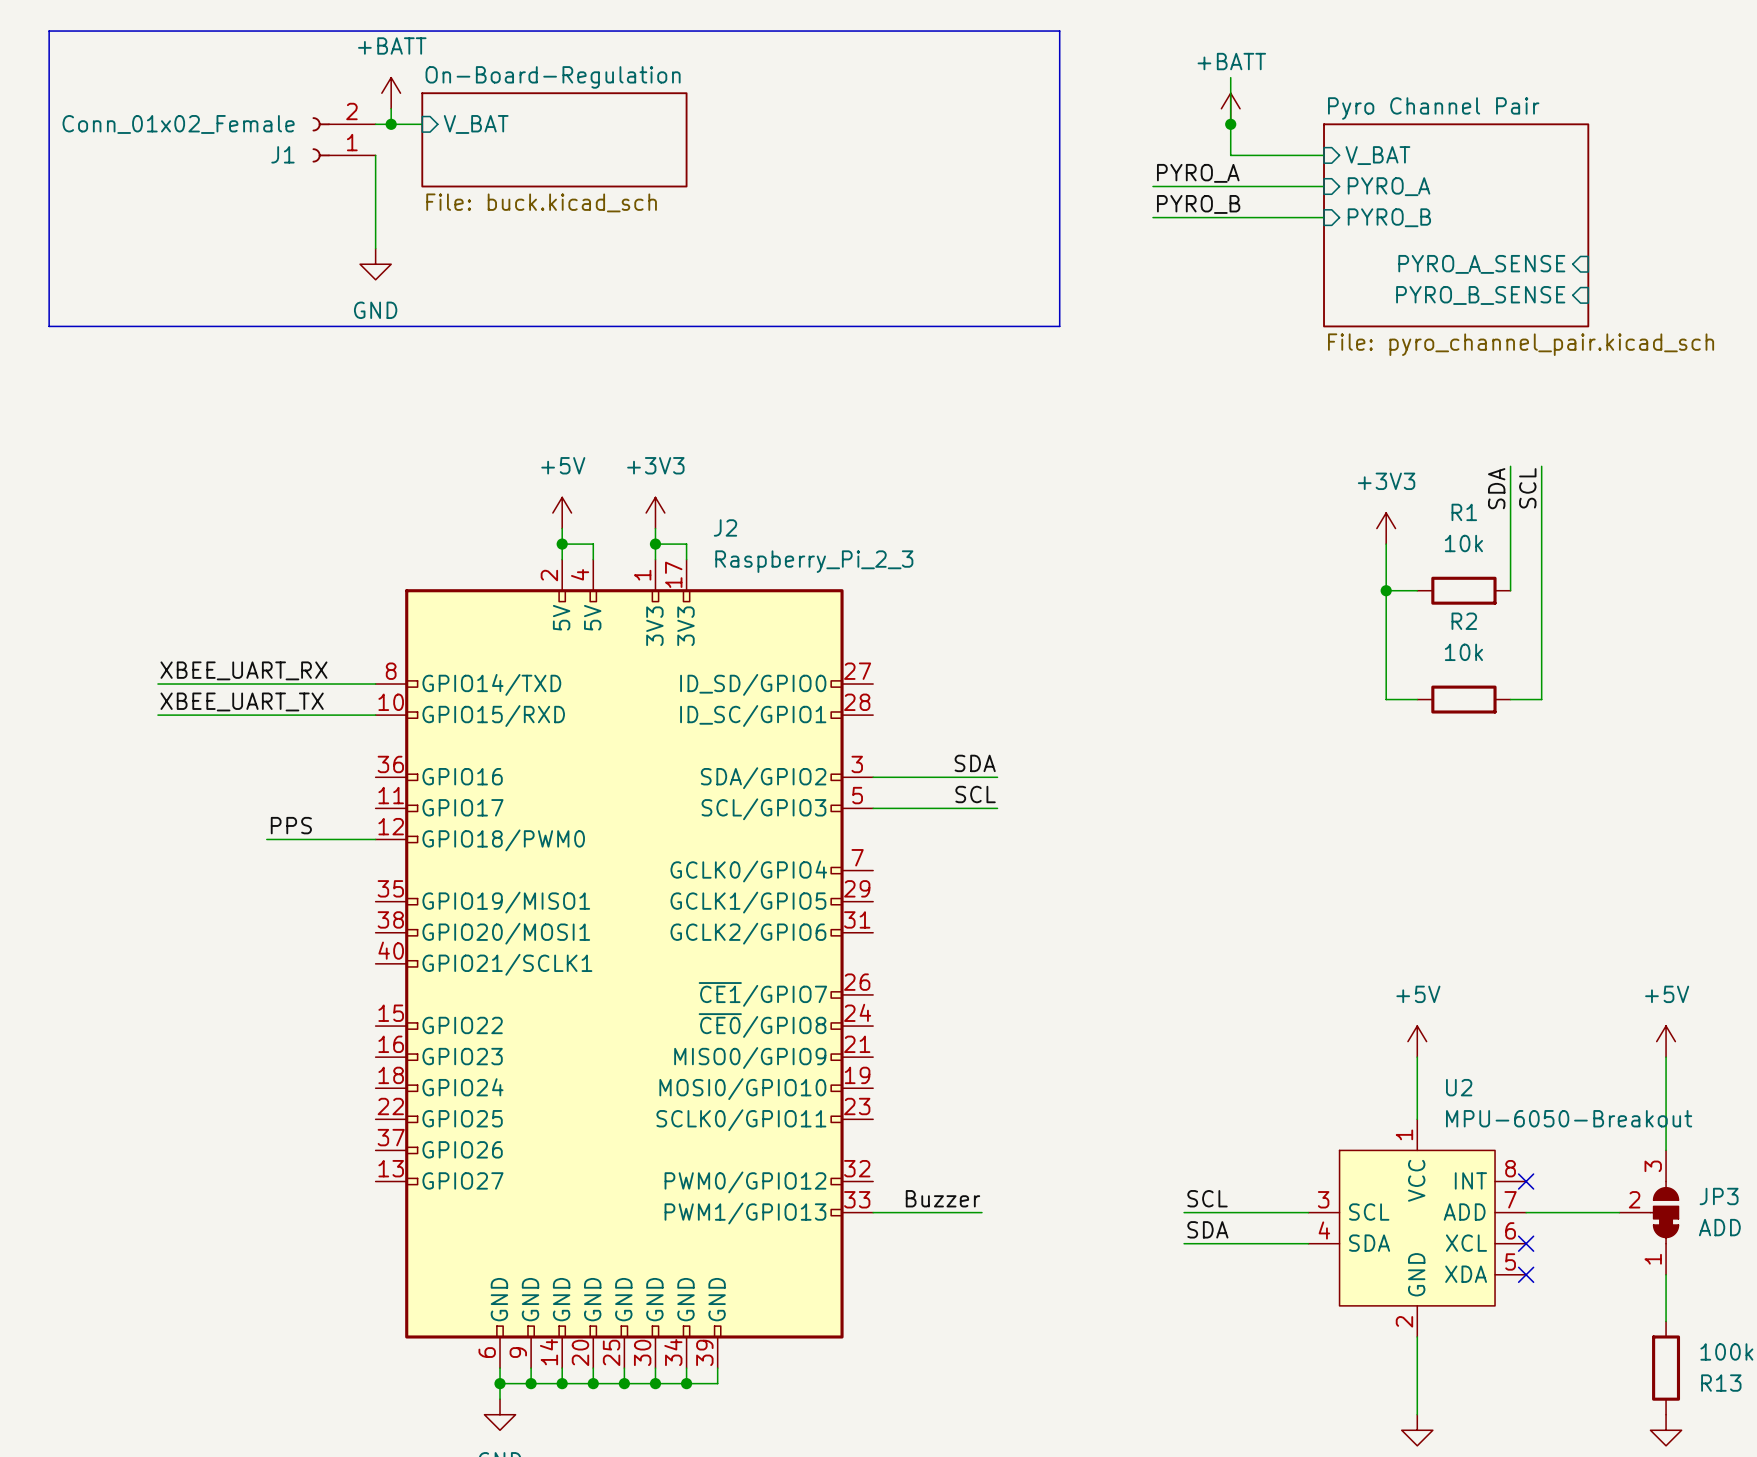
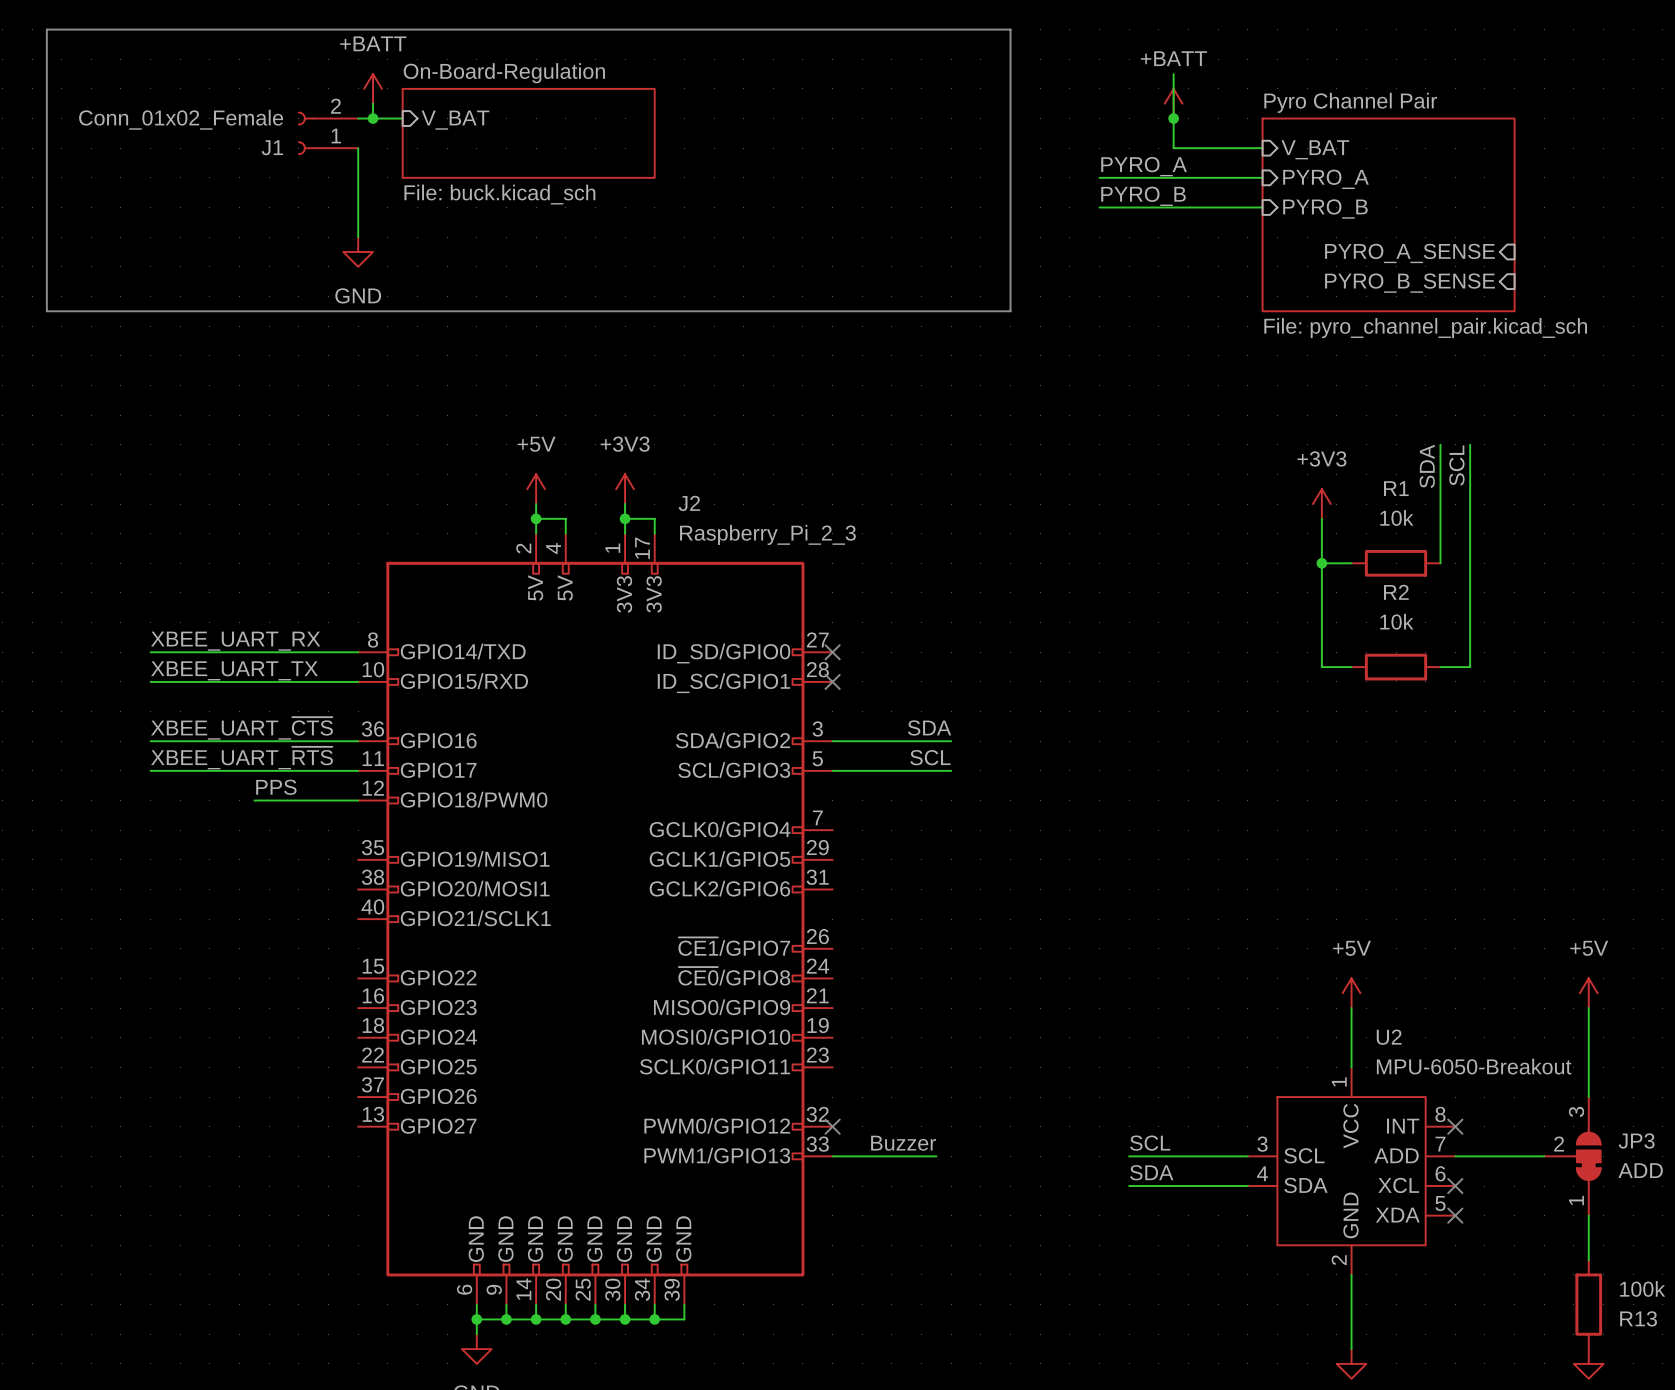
no-connect mark: none -> (832, 652)
no-connect mark: none -> (832, 681)
label: none -> XBEE_UART_~{CTS} (242, 728)
wire: none -> (150, 741) (358, 741)
label: none -> XBEE_UART_~{RTS} (242, 758)
wire: none -> (150, 770) (358, 770)
no-connect mark: none -> (832, 1126)

